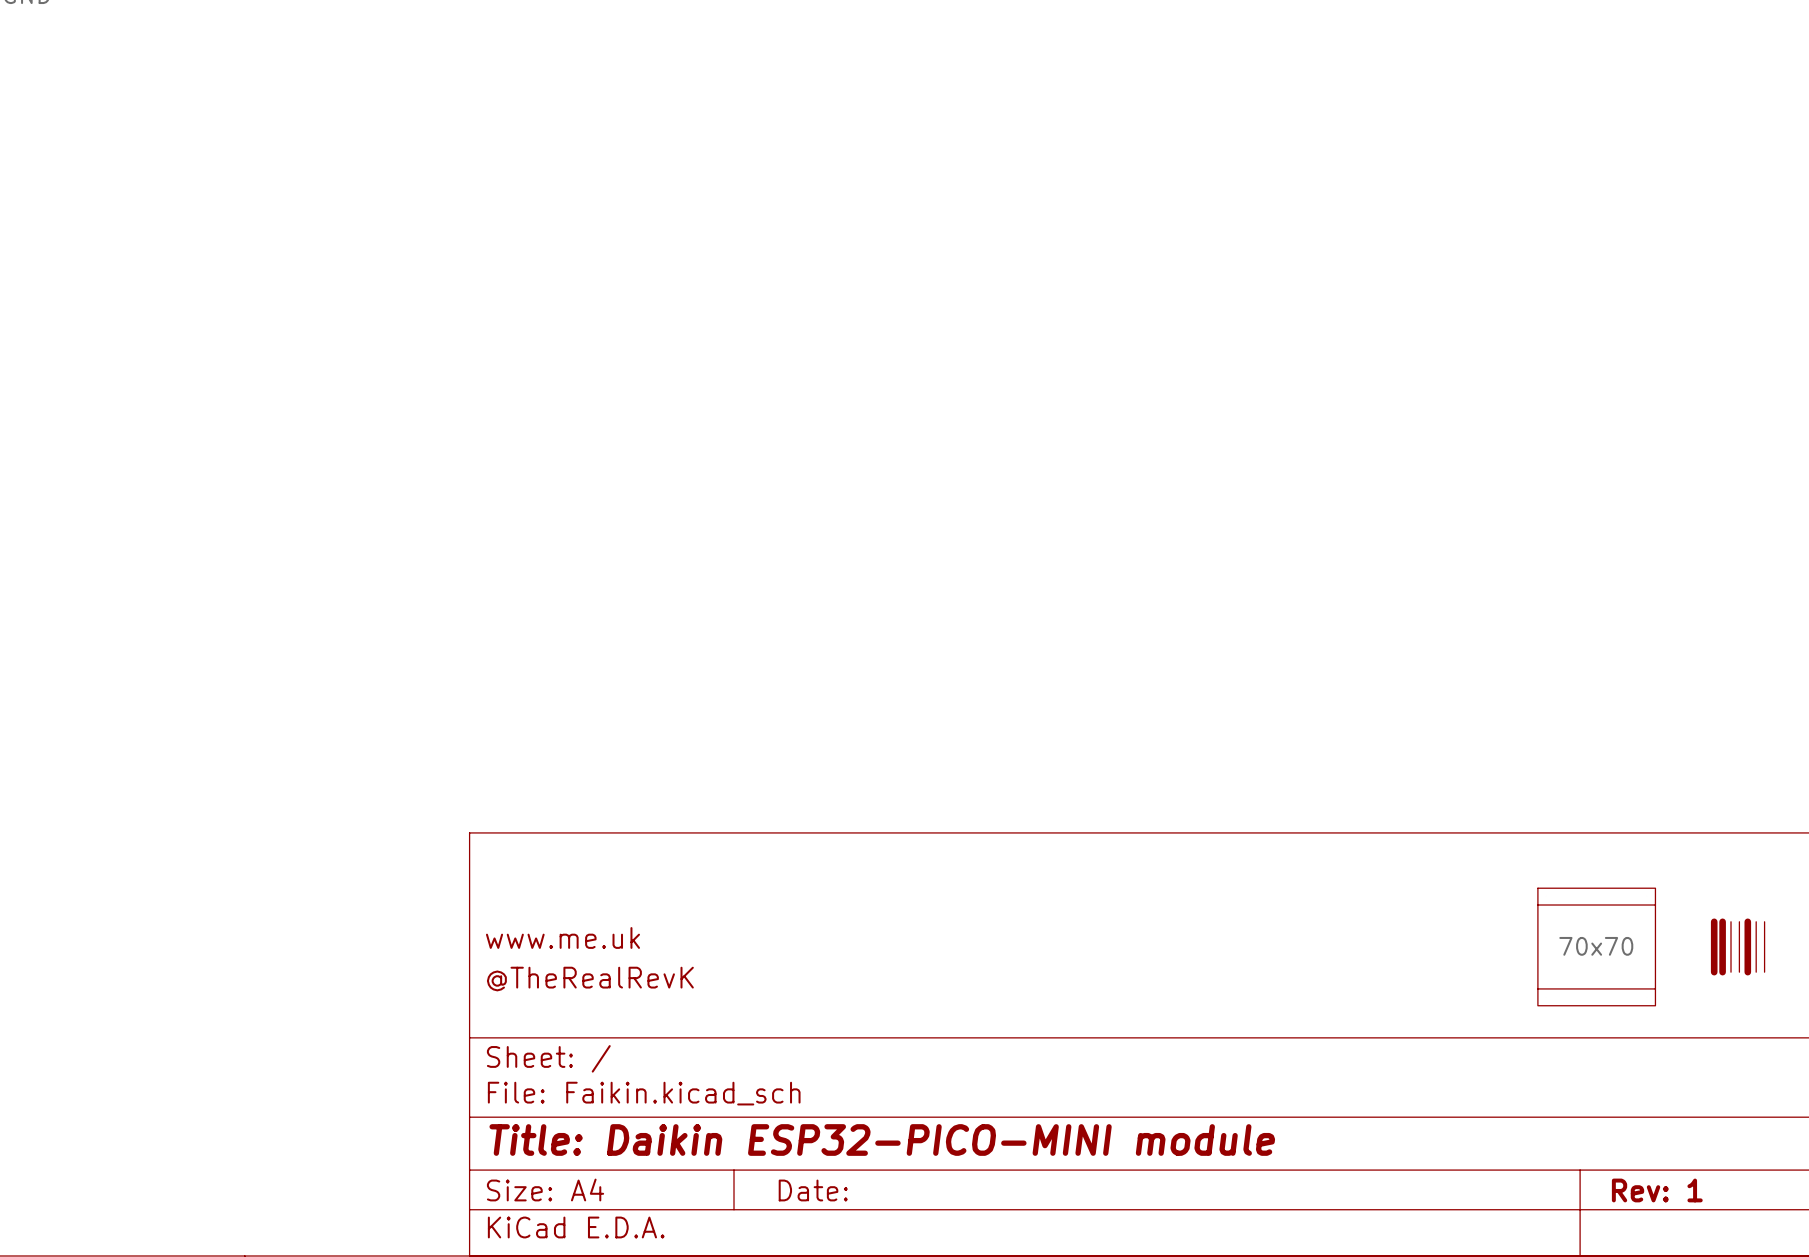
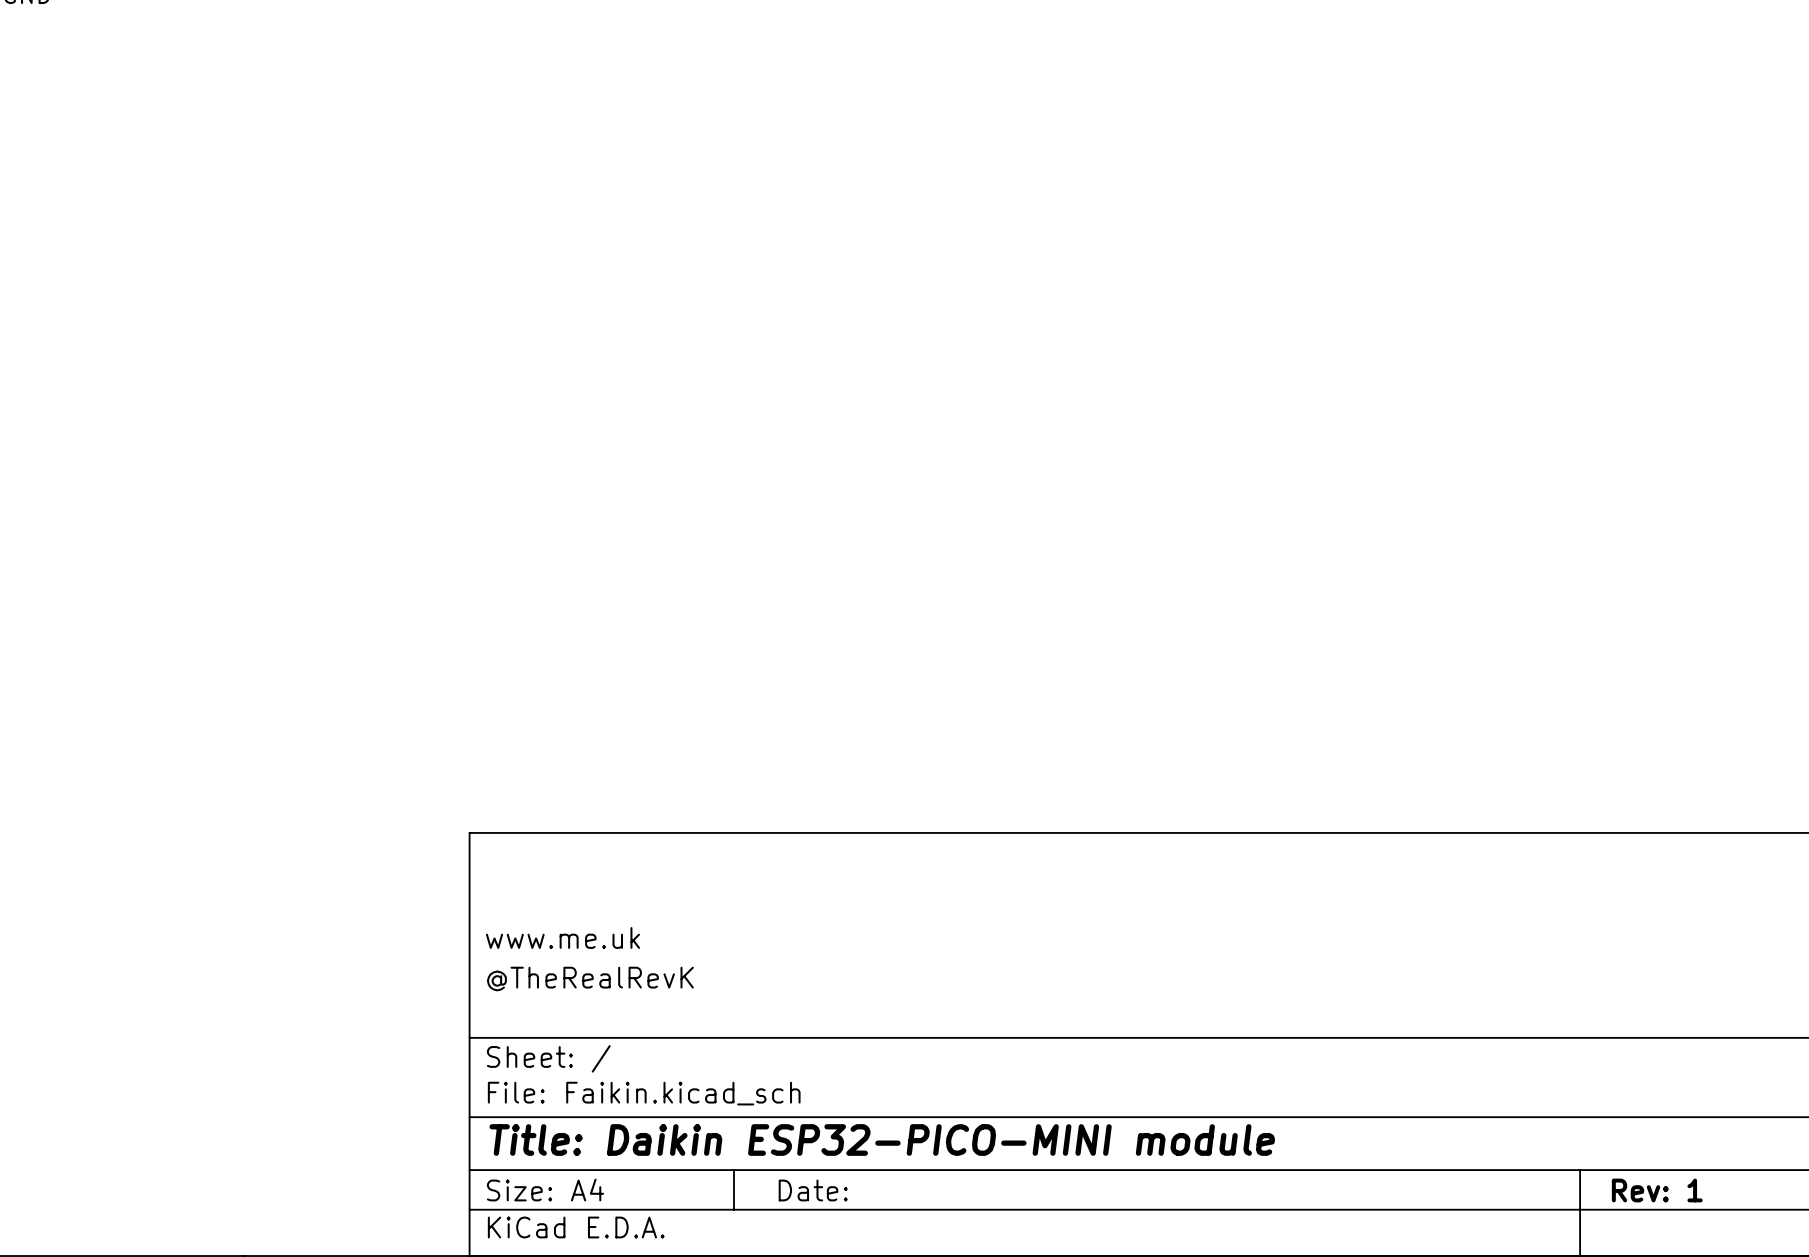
part: (1596, 905) -> none
part: 70x70 (1596, 946) -> none
part: (1737, 946) -> none
part: (1596, 988) -> none

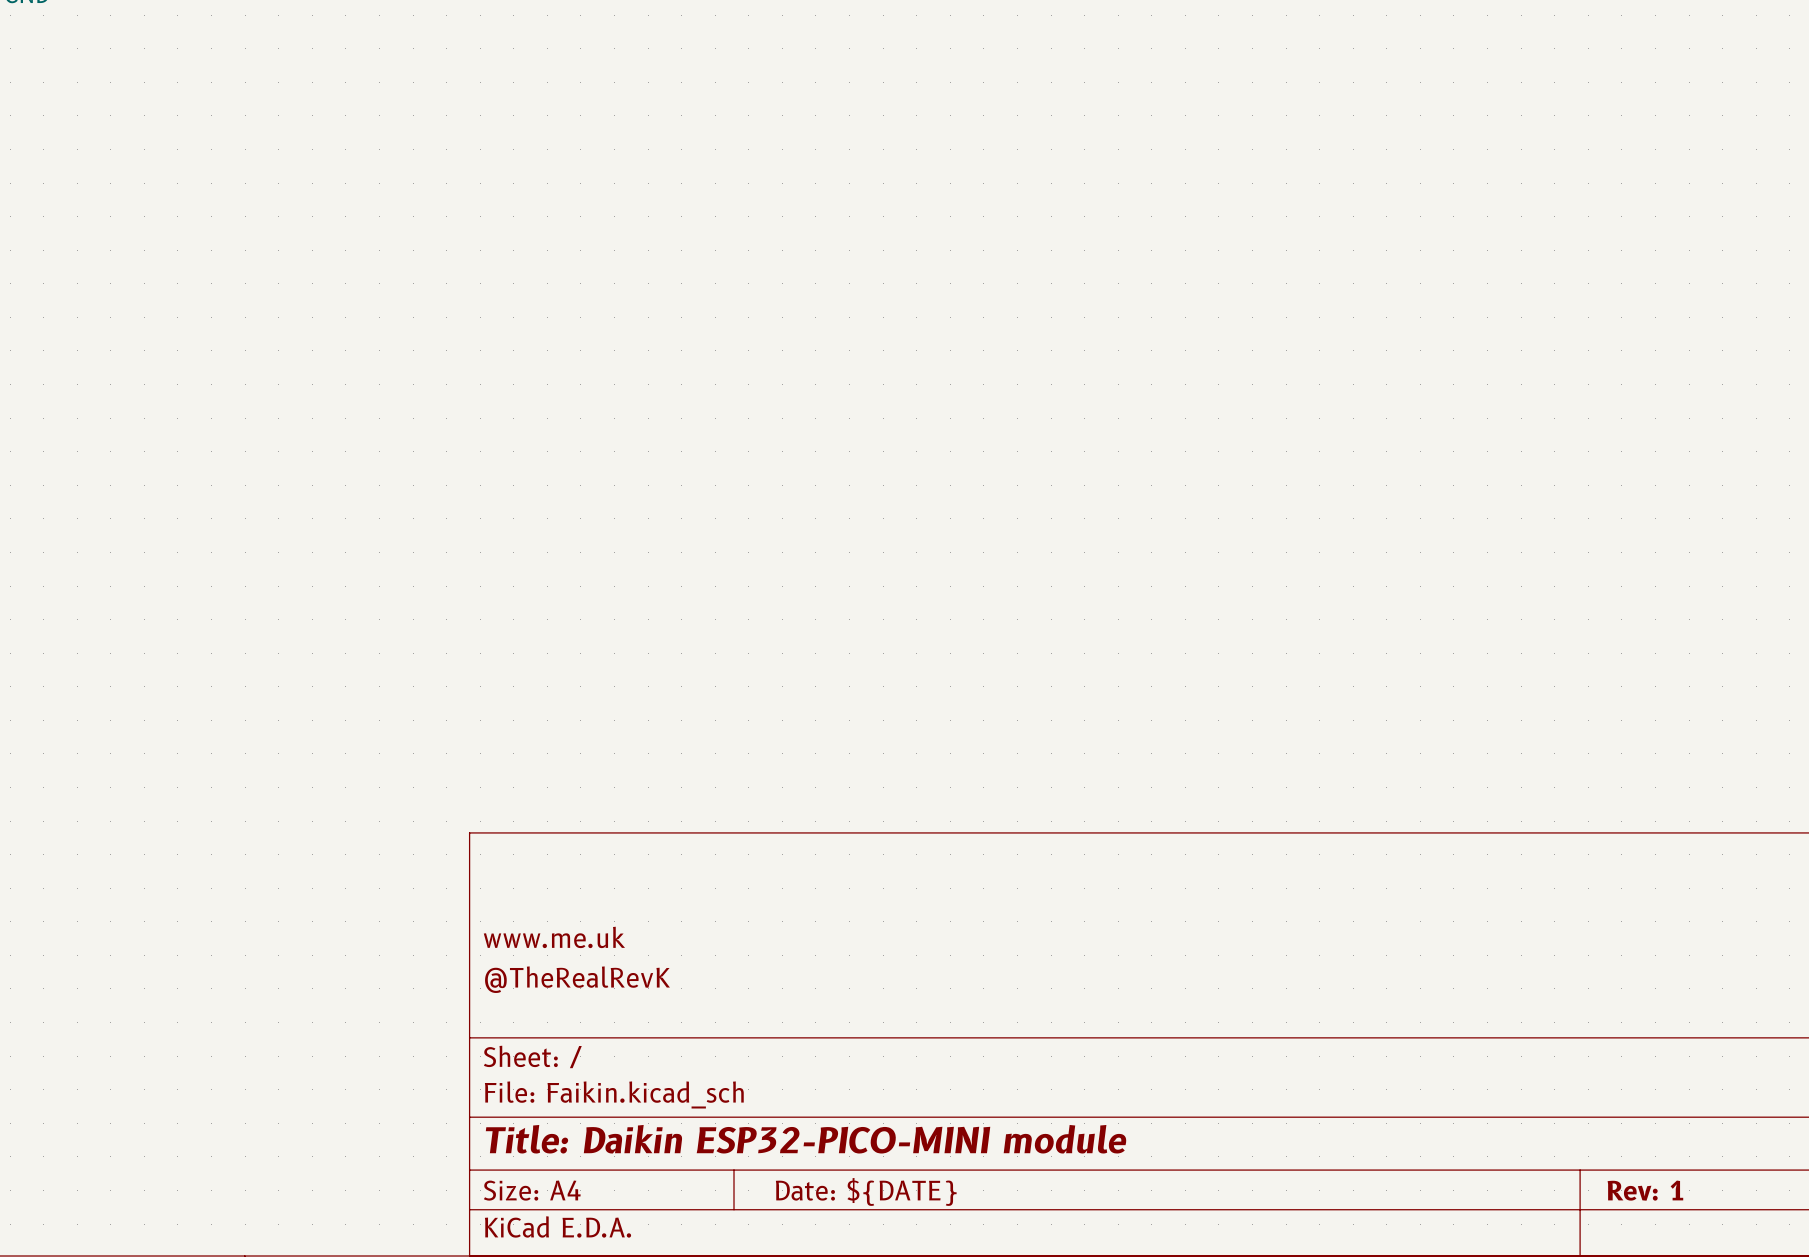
title block: Date: (813, 1190) -> Date: ${DATE} (866, 1191)

